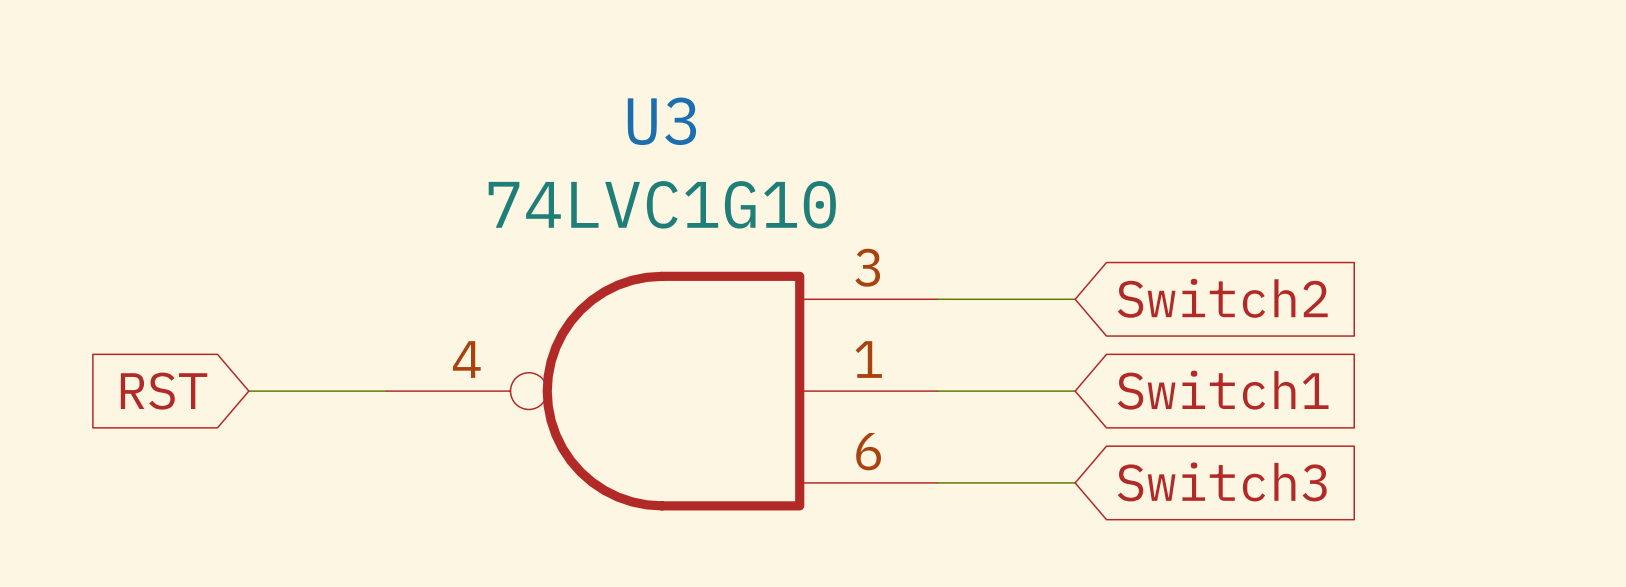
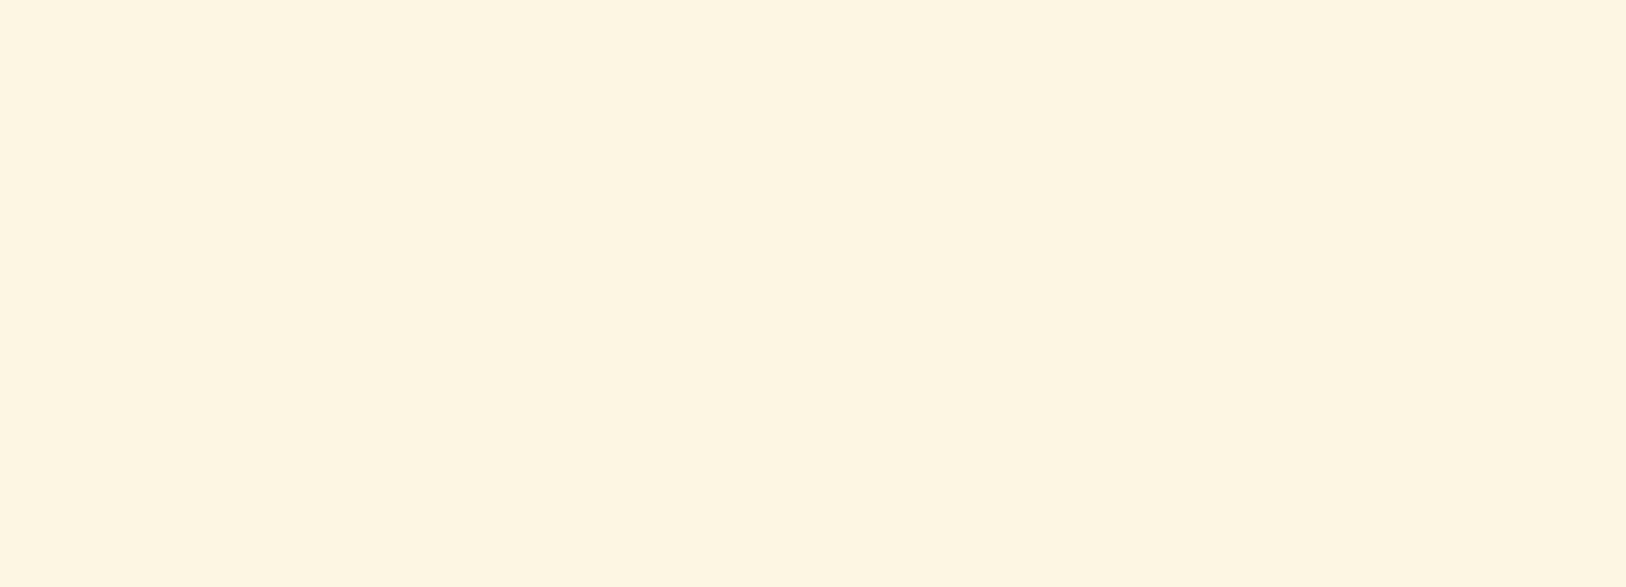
global label: Switch2 (1222, 298) -> none
wire: (937, 299) (1075, 299) -> none
global label: Switch1 (1223, 390) -> none
global label: RST (164, 391) -> none
wire: (248, 391) (386, 391) -> none
U3: 74LVC1G10 (662, 391) -> none
wire: (937, 391) (1075, 391) -> none
global label: Switch3 (1222, 481) -> none
wire: (937, 482) (1075, 482) -> none

